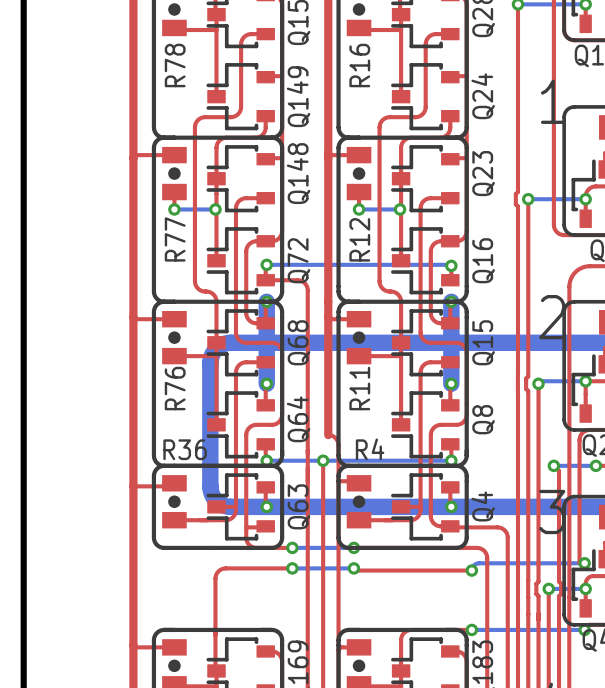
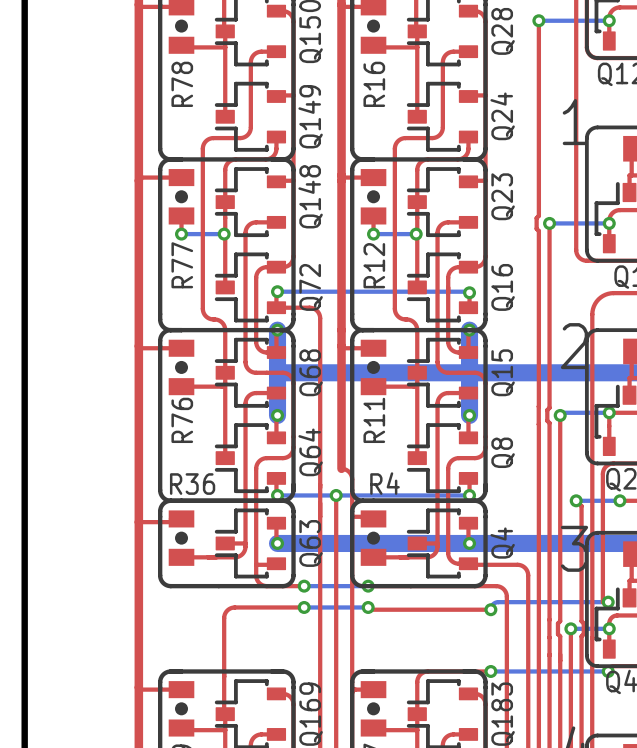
bottom track: (266, 342) (223, 344) (214, 350) (210, 363) (211, 494) (218, 502) (225, 506) (266, 506) -> none

